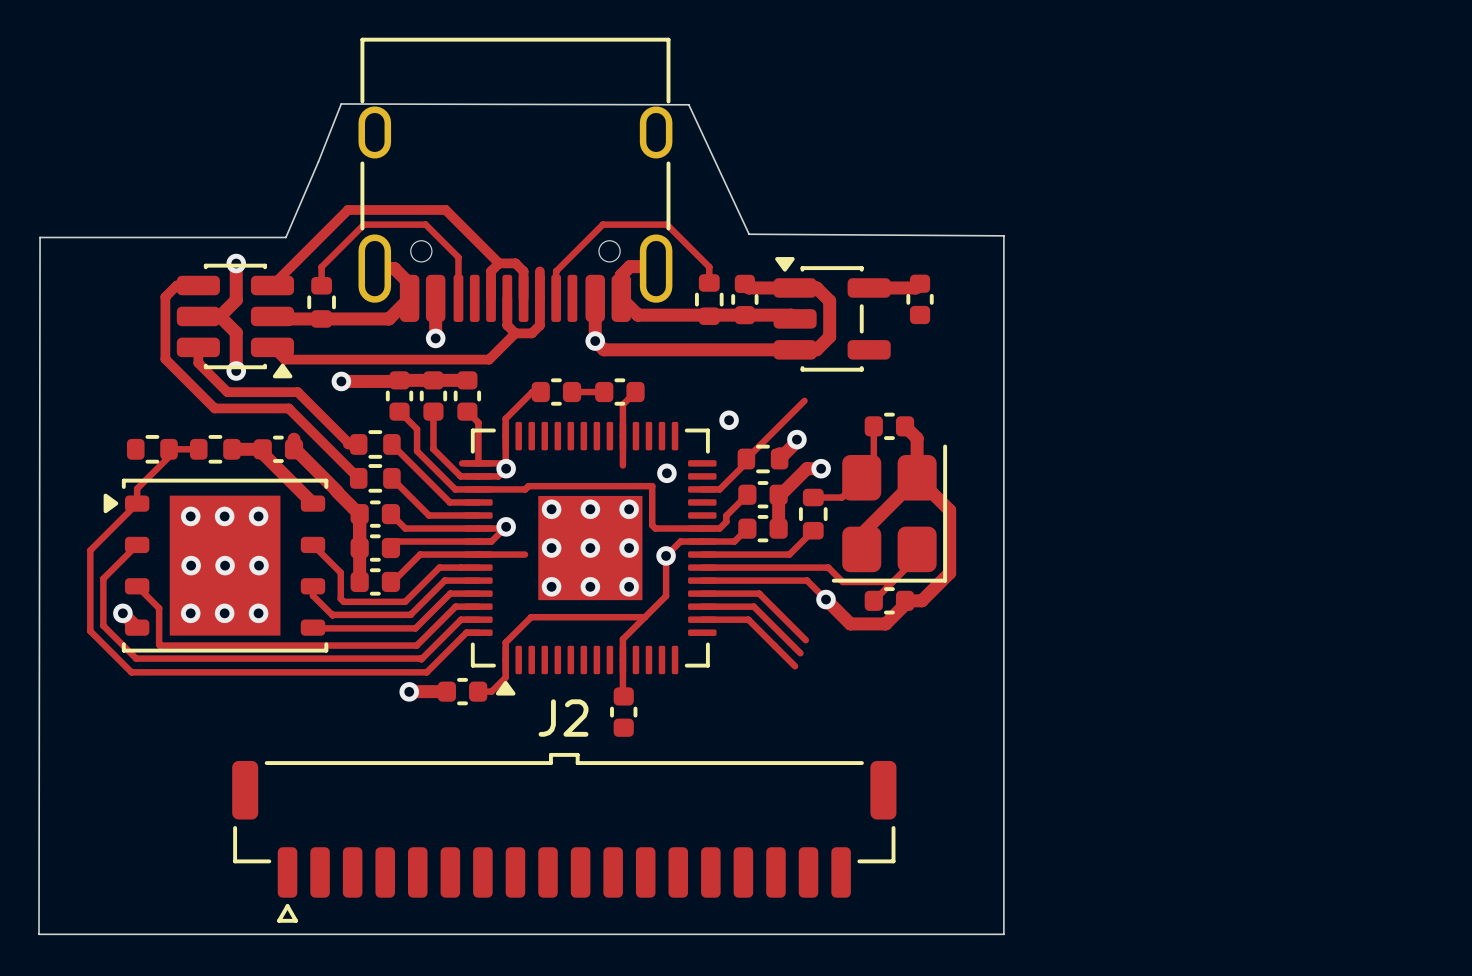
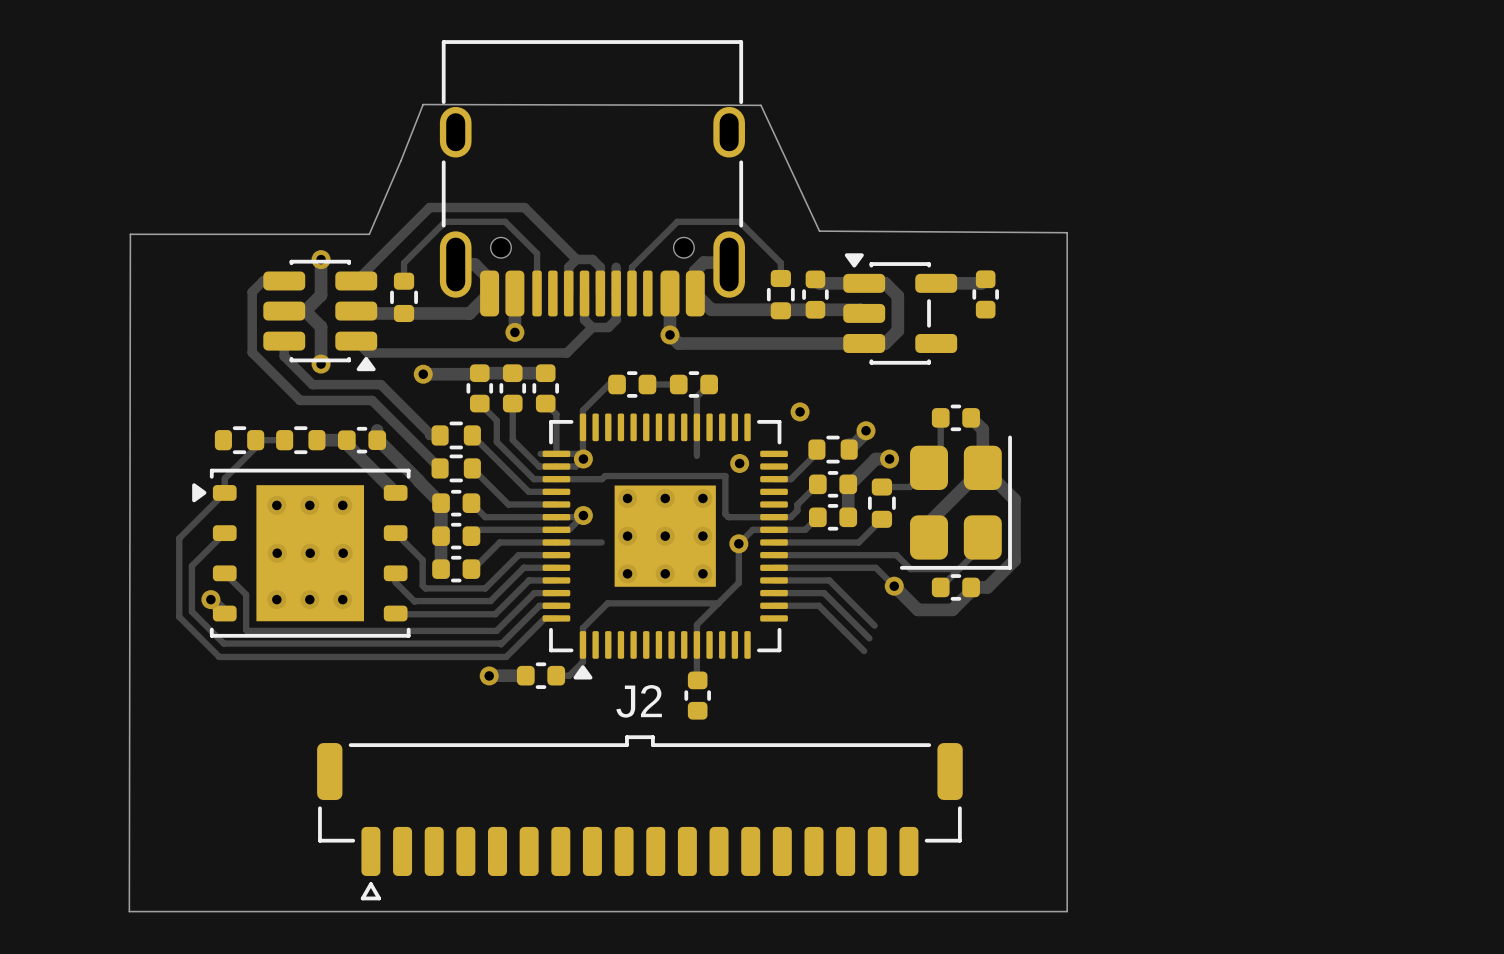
track: (804, 400) (746, 459) -> none

